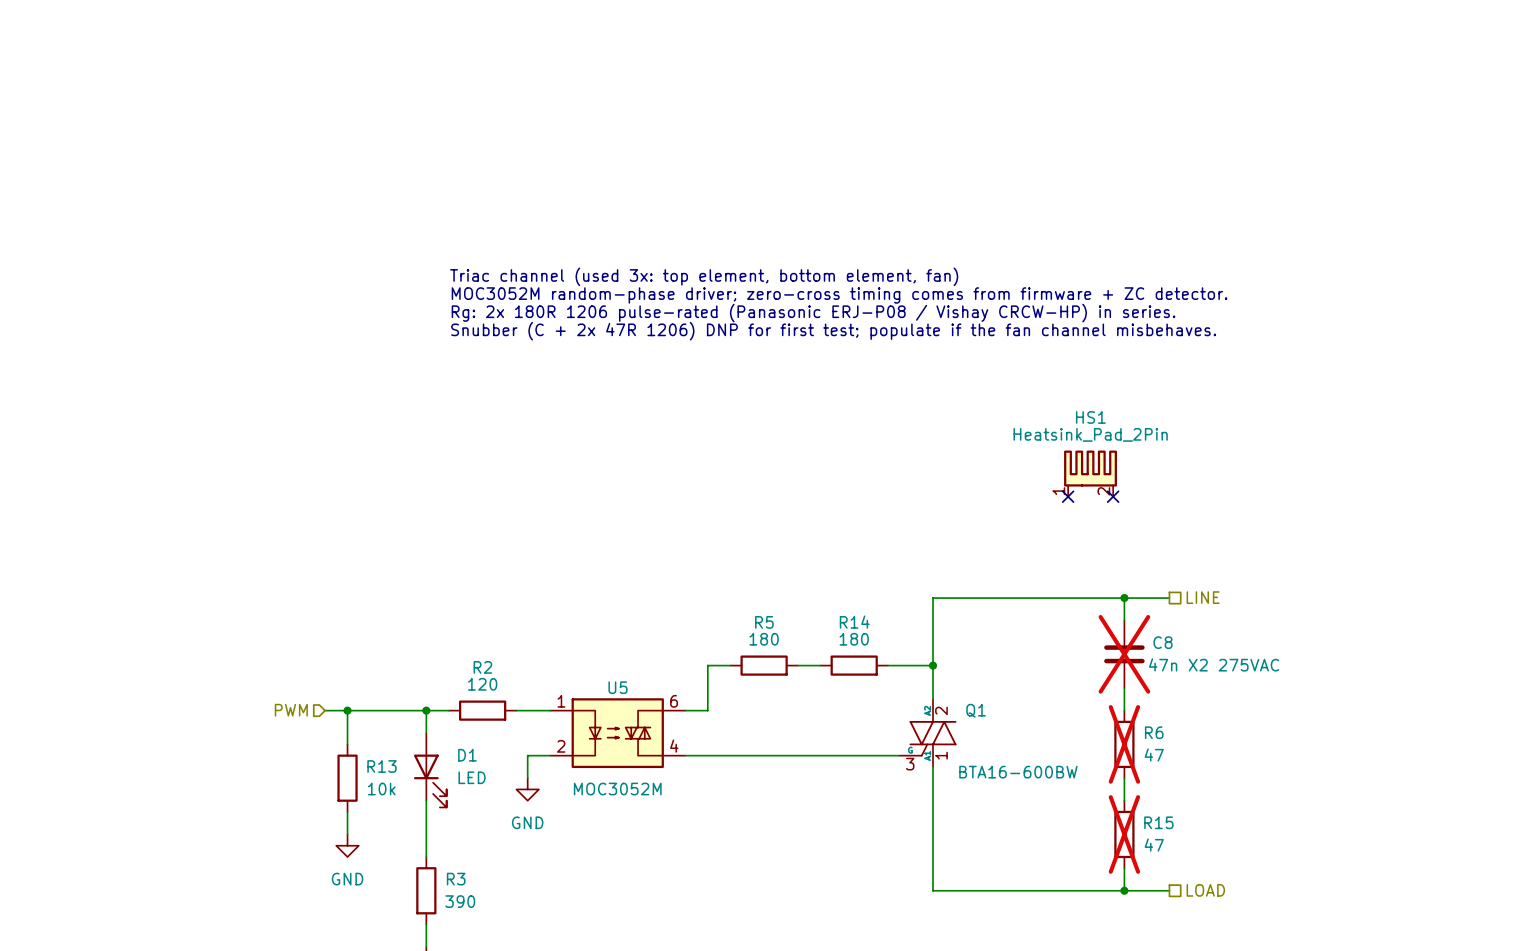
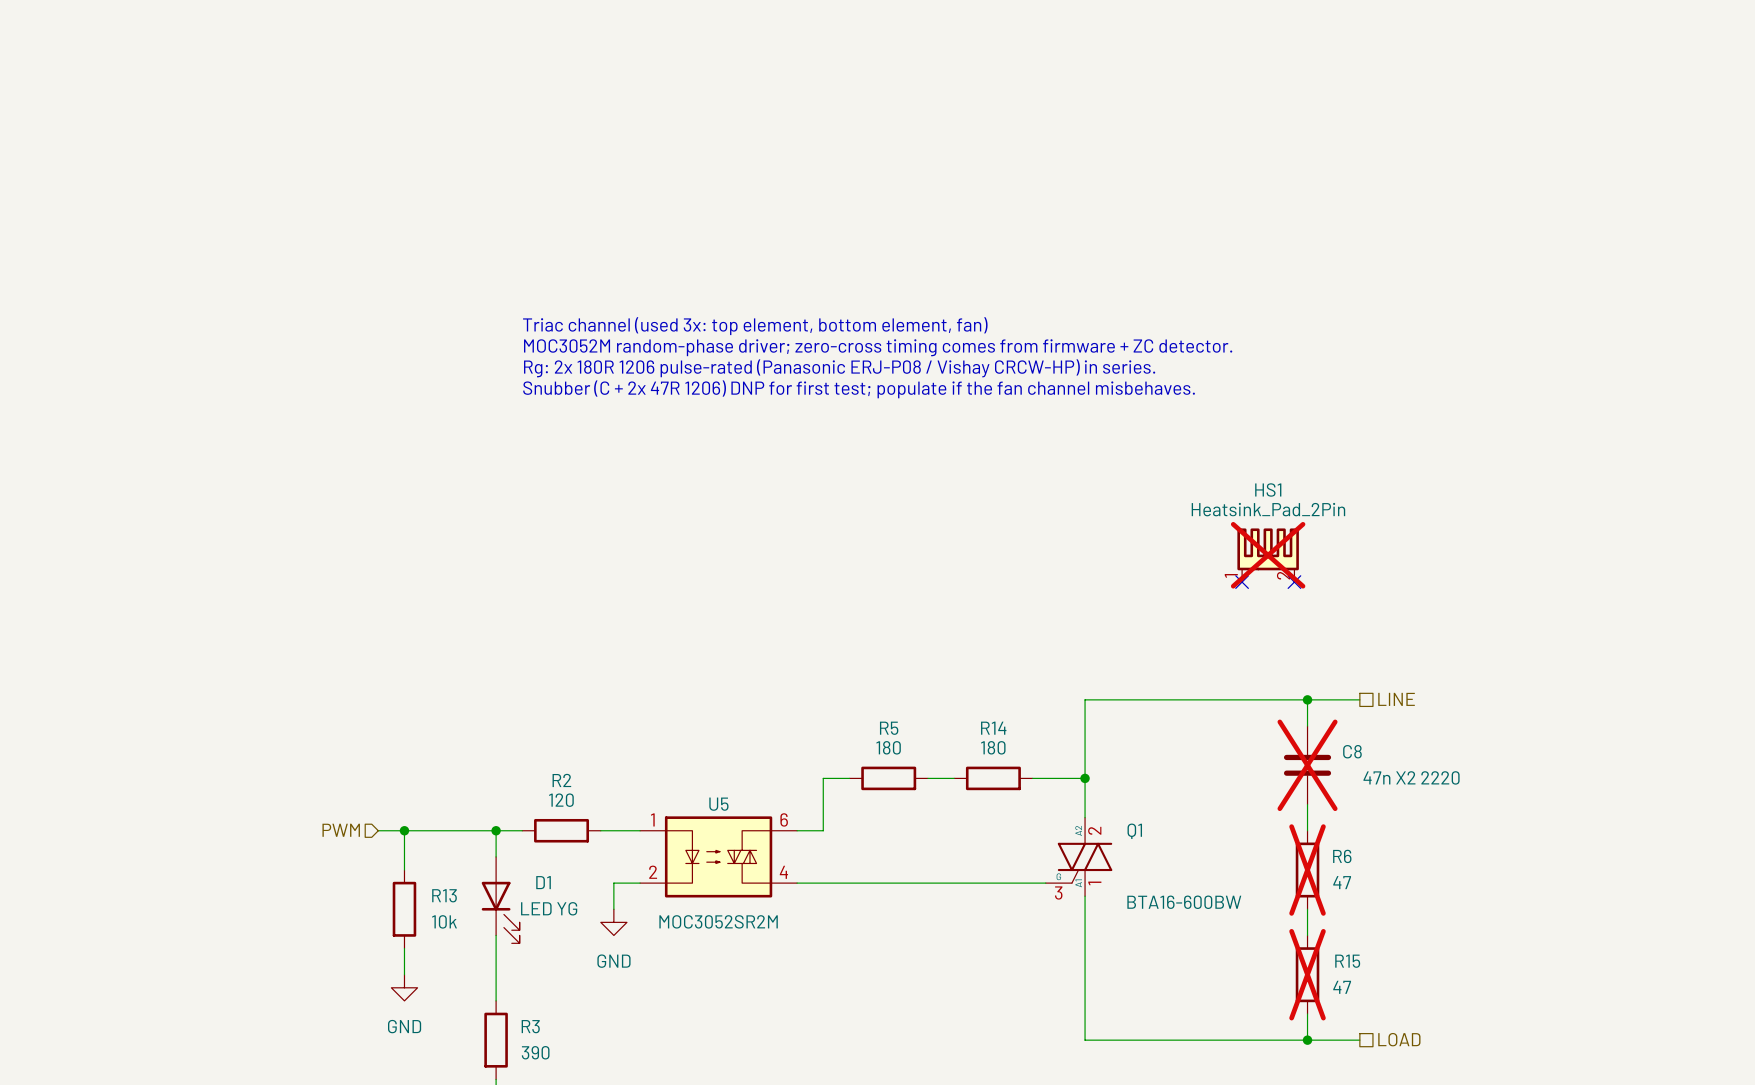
HS1 do-not-place cross: none -> (1268, 555)
C8 value: 47n X2 275VAC (1214, 664) -> 47n X2 2220 (1411, 777)
D1 value: LED (472, 777) -> LED YG (549, 908)
U5 value: MOC3052M (617, 789) -> MOC3052SR2M (718, 921)

